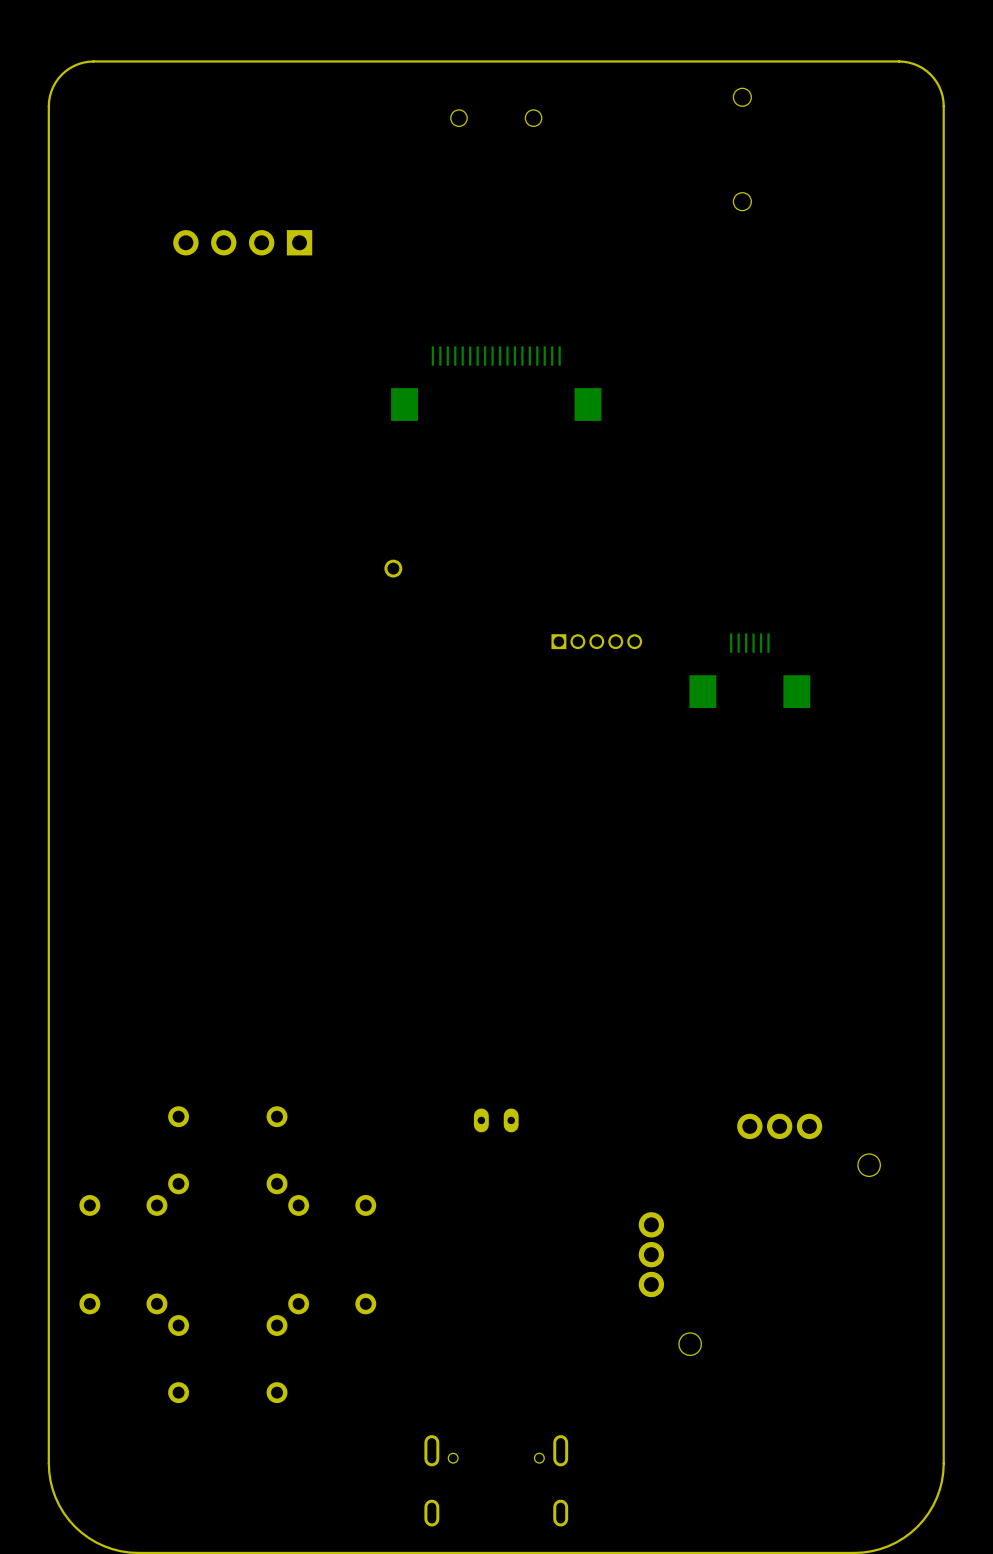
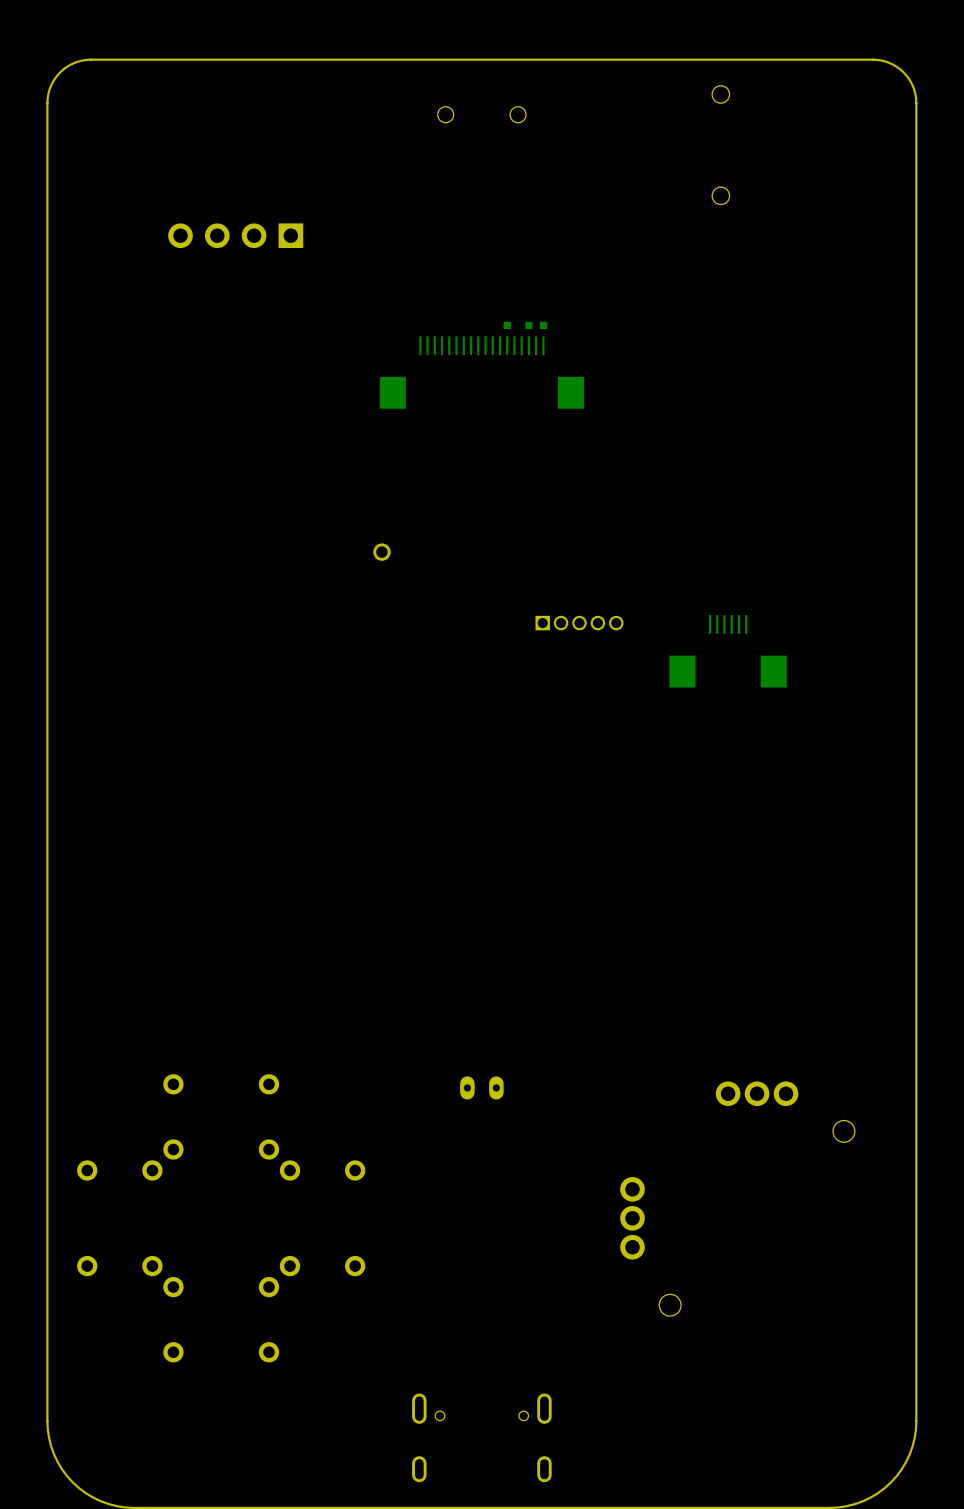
part footprint: [391, 346, 602, 421] -> [379, 321, 584, 409]

